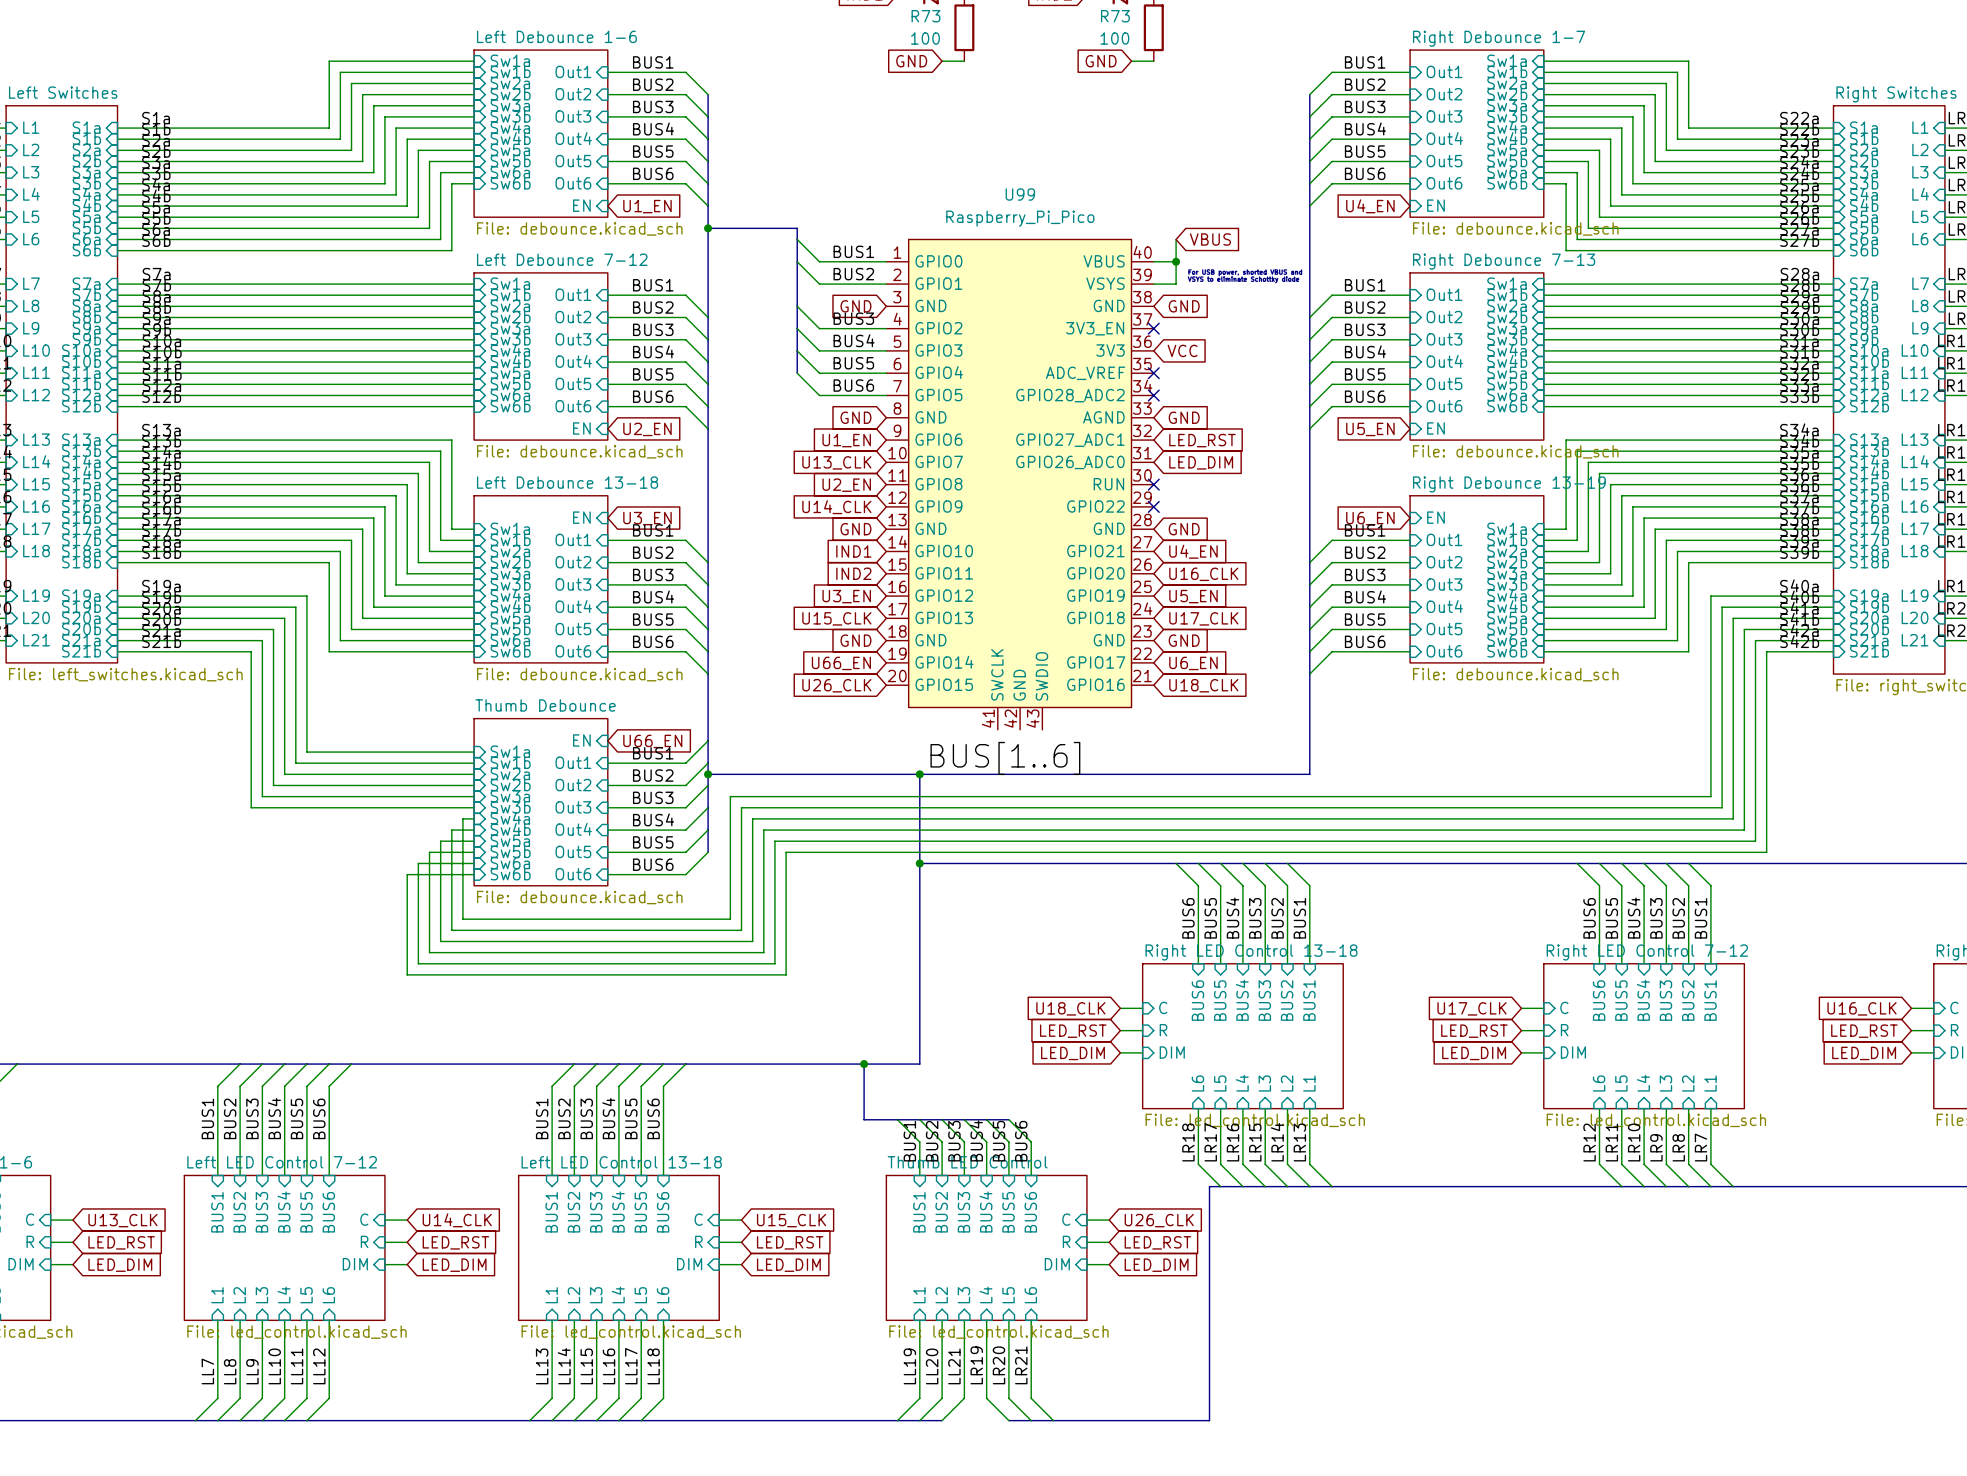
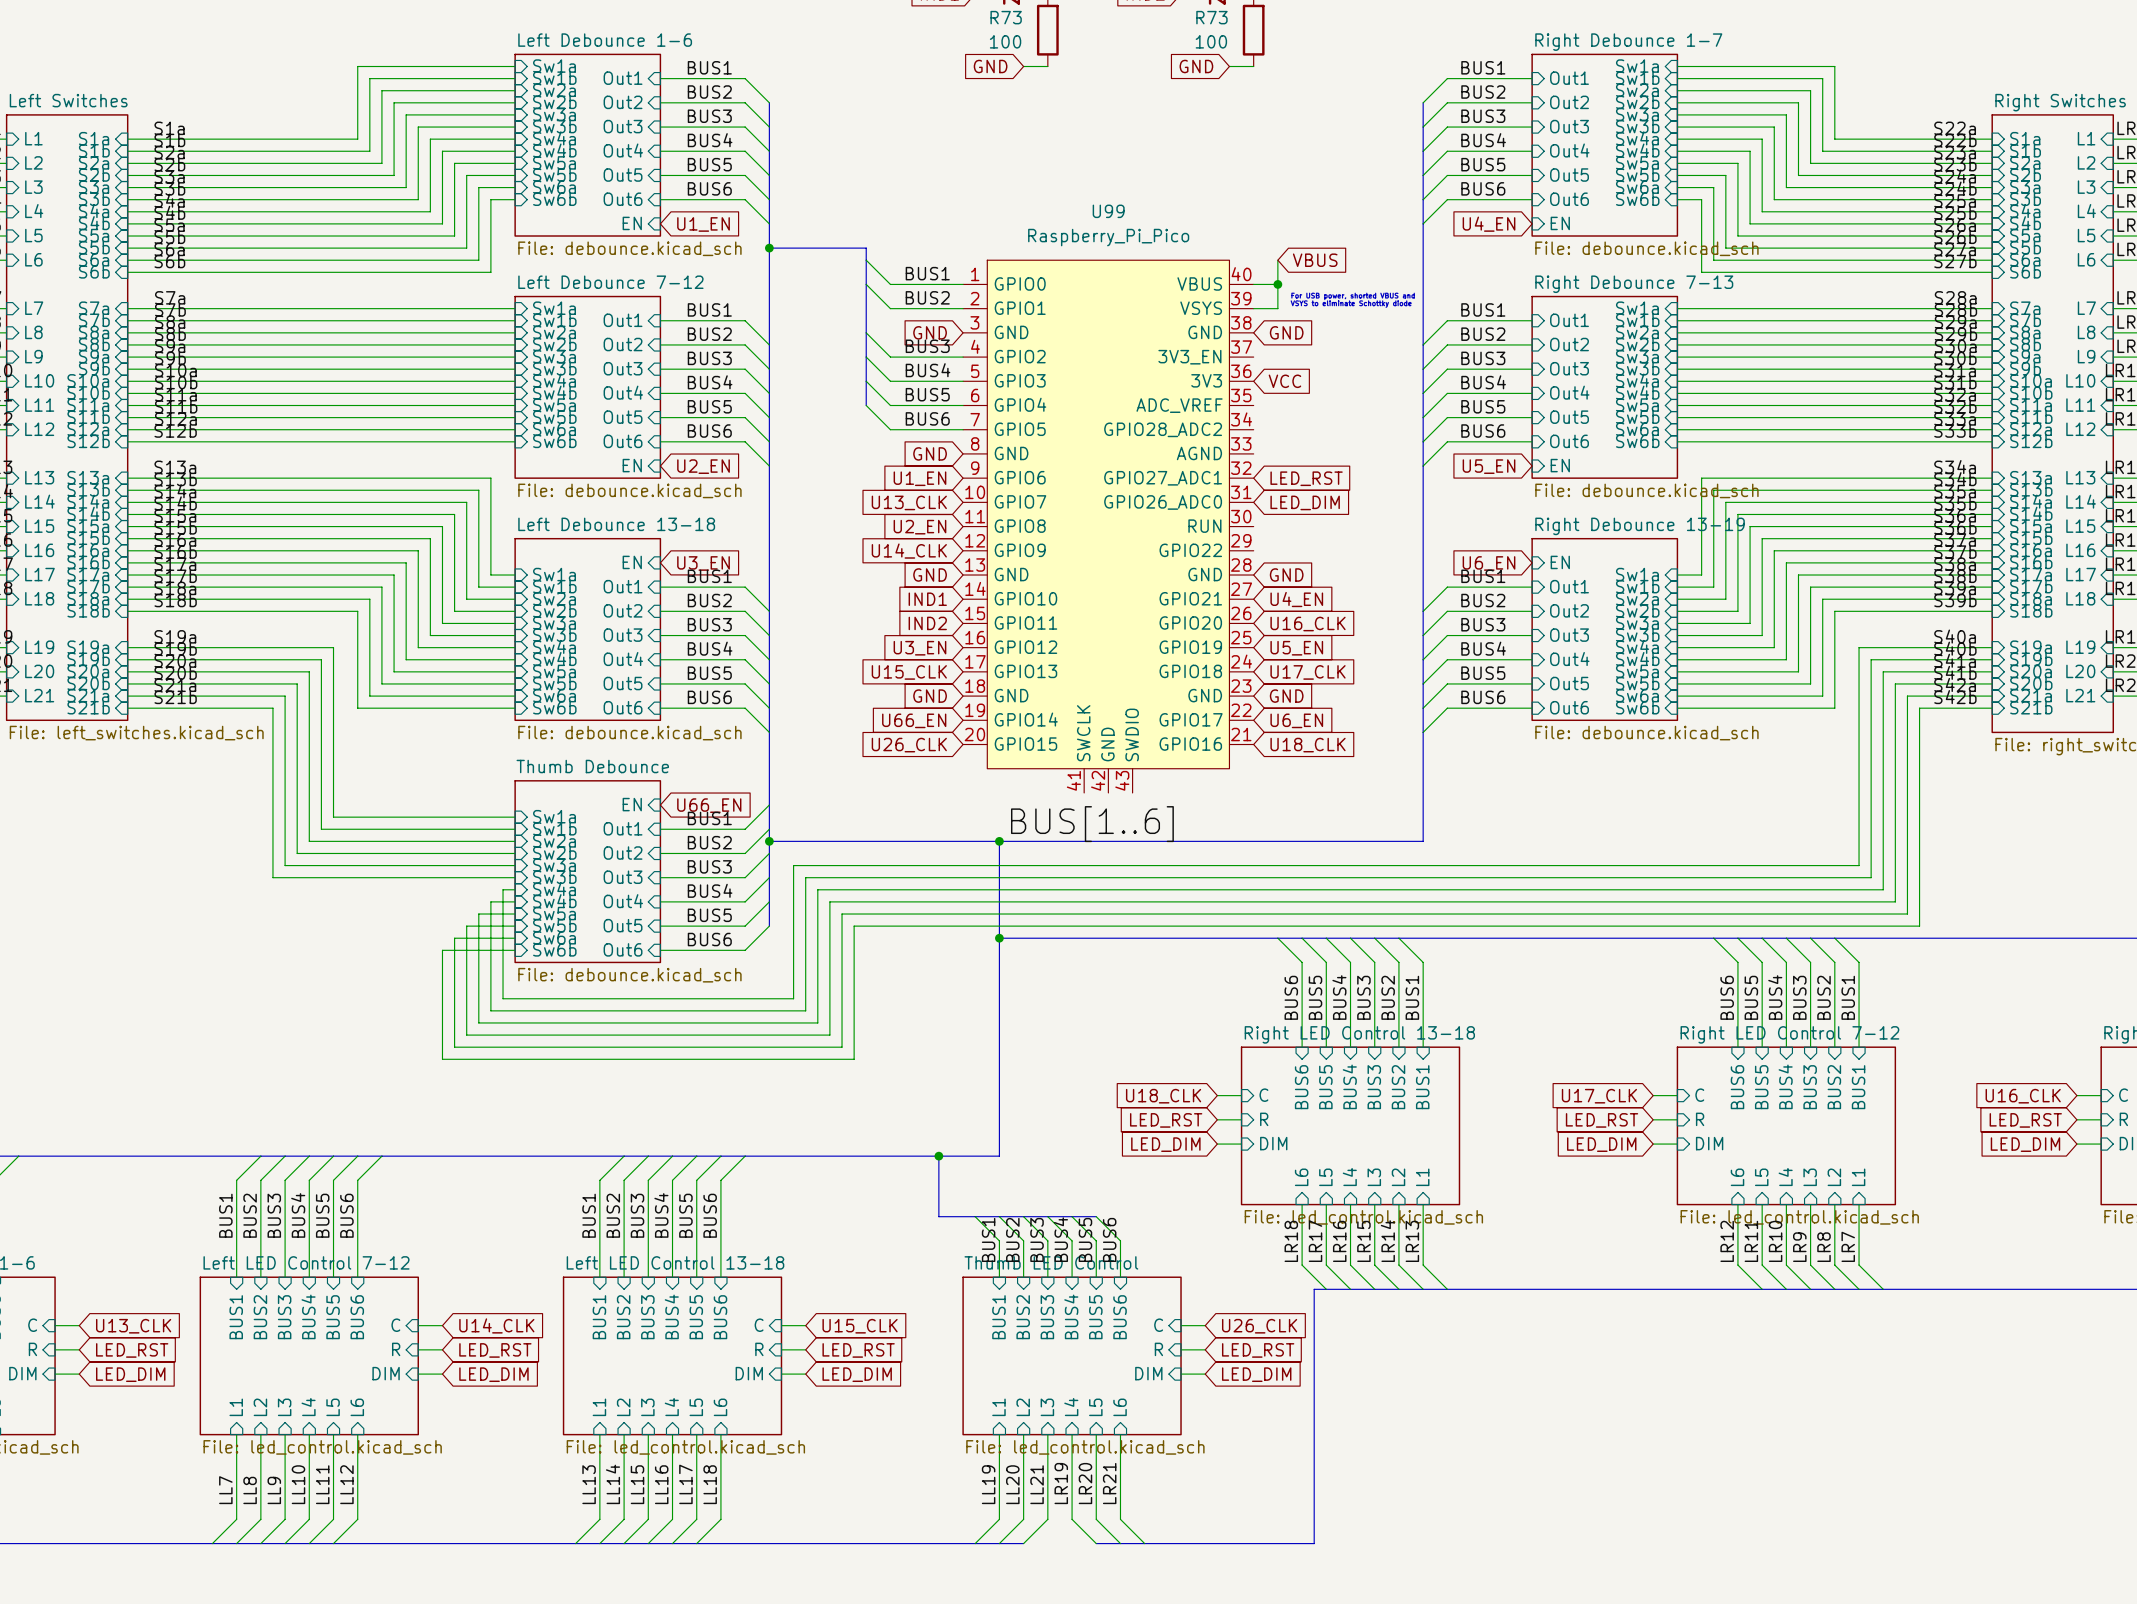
no-connect mark: (1153, 328) -> none
no-connect mark: (1153, 373) -> none
no-connect mark: (1153, 395) -> none
global label: GND (1184, 417) -> none
no-connect mark: (1153, 484) -> none
no-connect mark: (1153, 506) -> none

